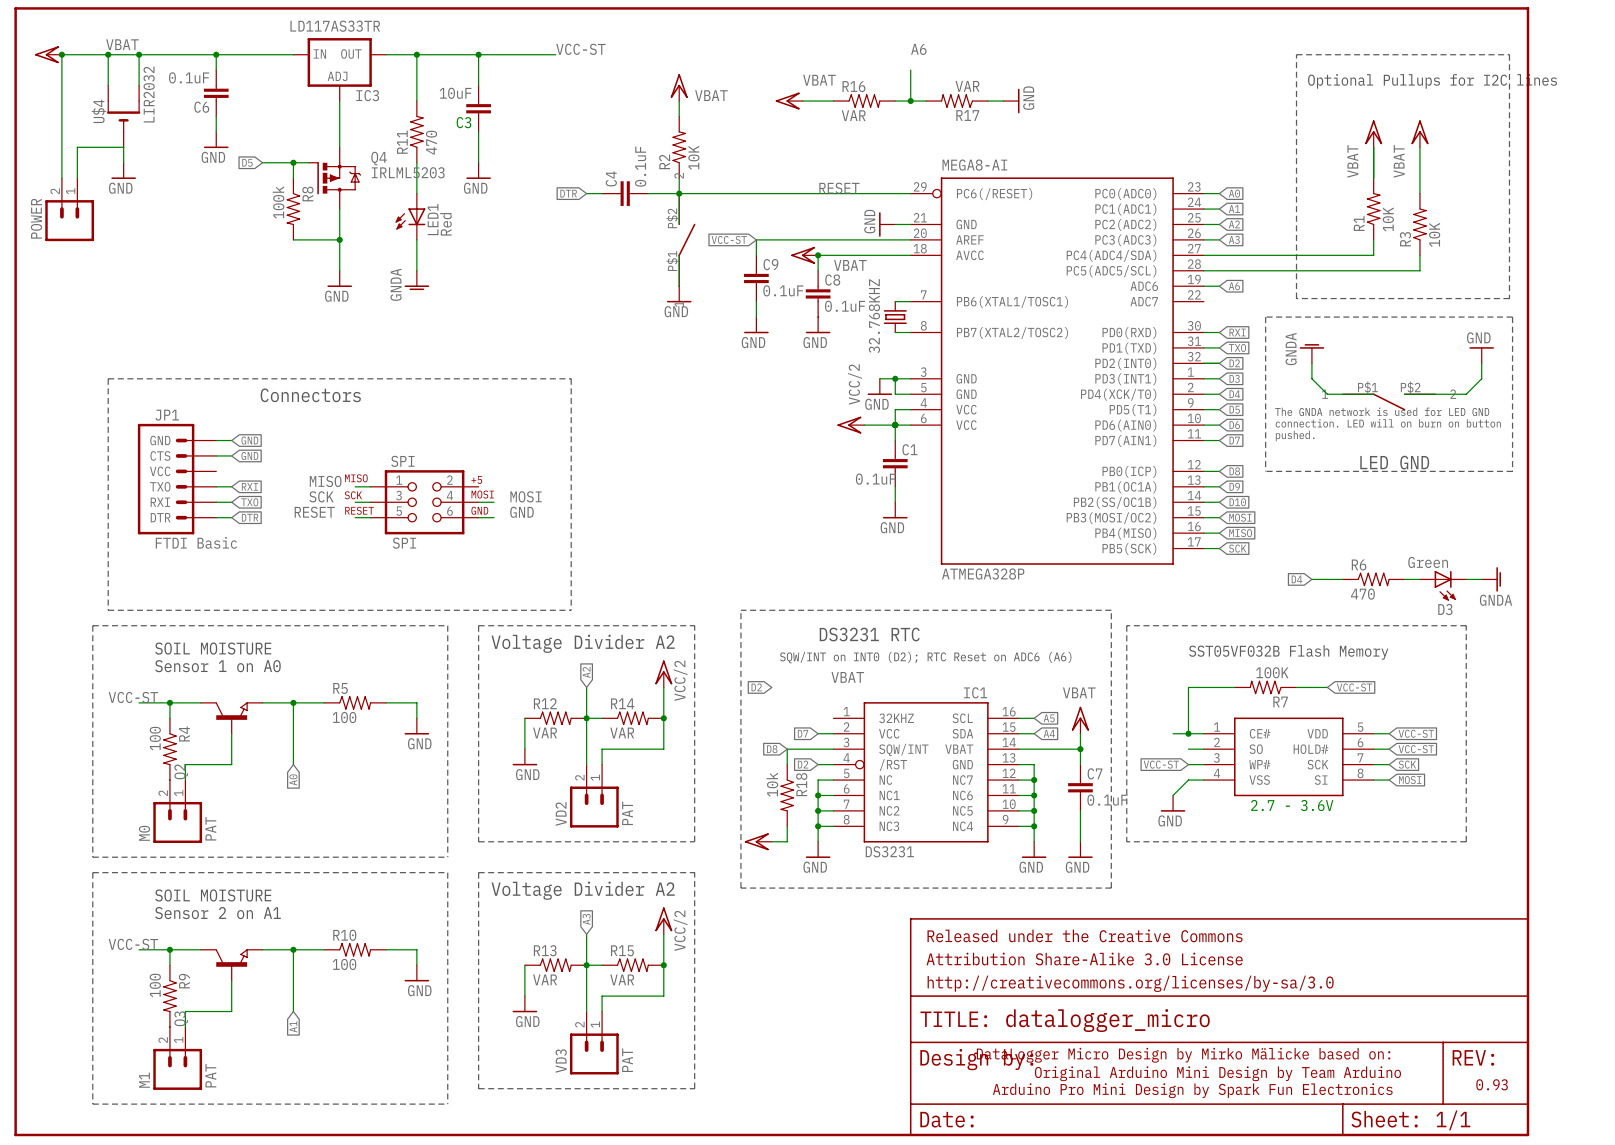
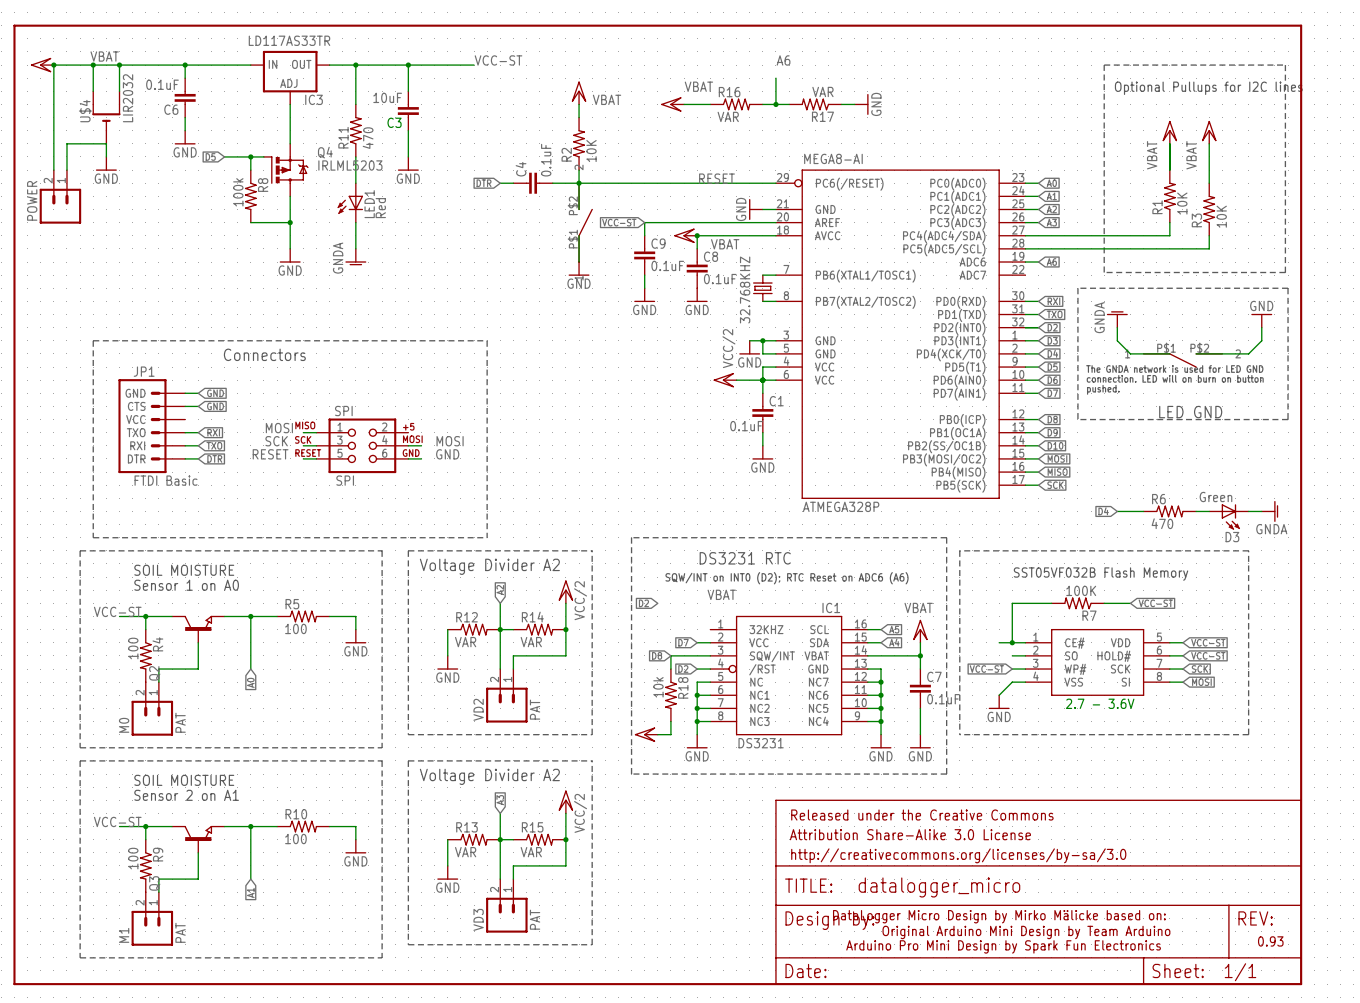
label: MISO (325, 481) -> MOSI (279, 428)

